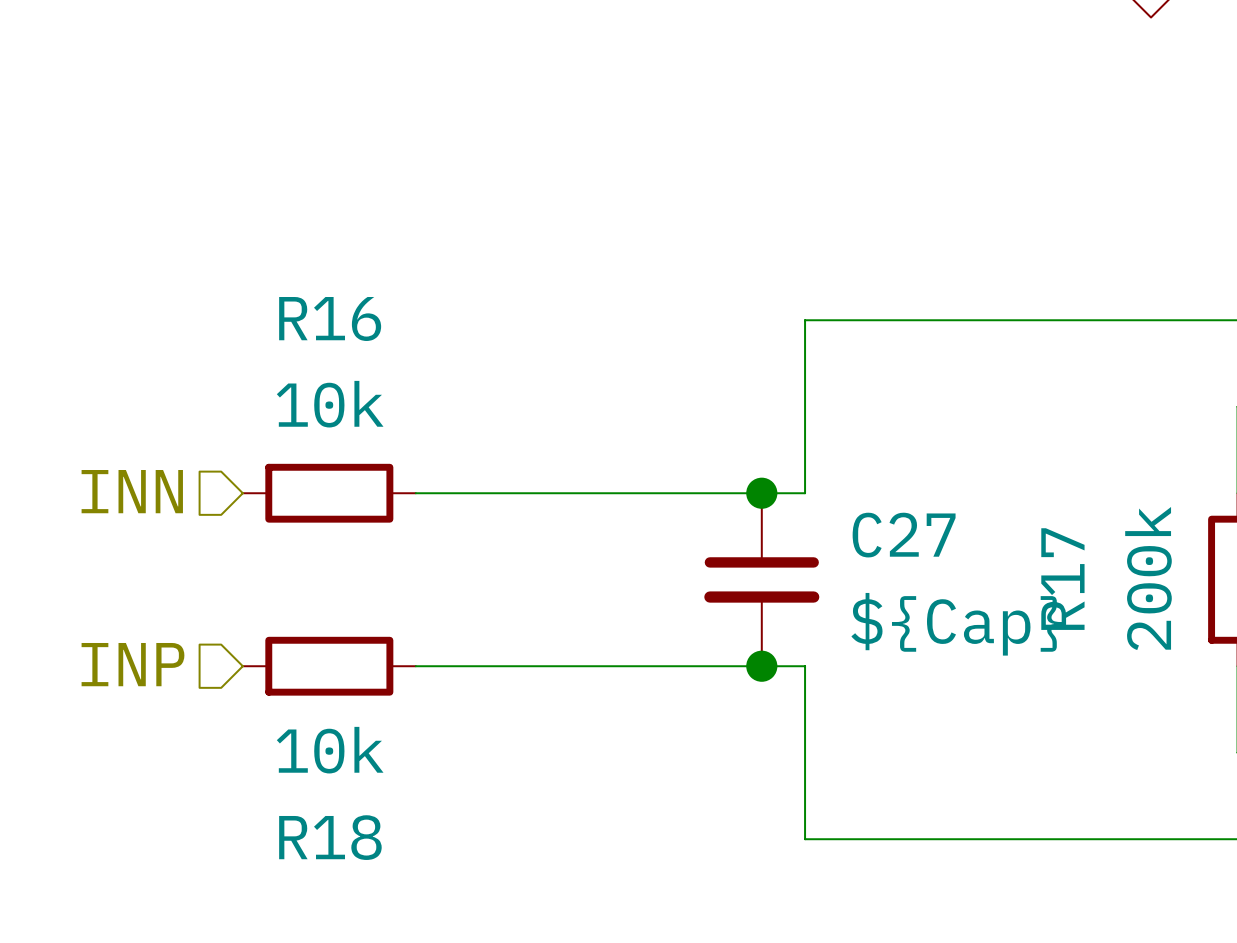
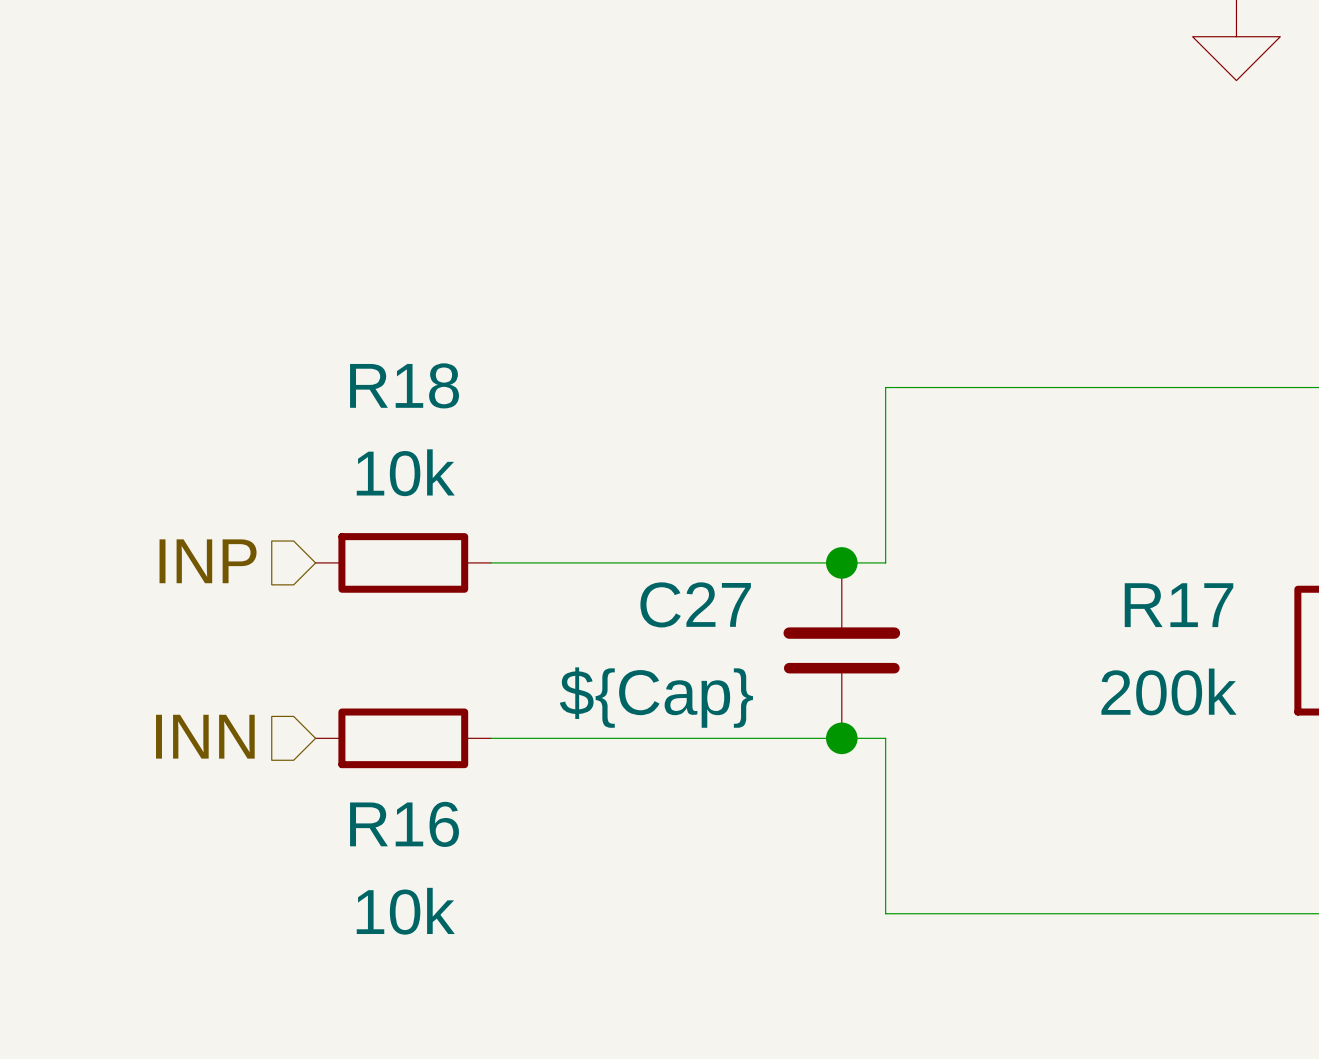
R16 name: R16 (330, 319) -> R18 (404, 385)
hierarchical label: INN (132, 491) -> INP (208, 561)
C27 name position: C27 (904, 535) -> C27 (695, 604)
R17 value rotation: 0° (1148, 578) -> 90° clockwise (1169, 691)
C27 rotation: 0° (761, 579) -> 180° (841, 650)
R17 name rotation: 0° (1062, 579) -> 90° clockwise (1179, 605)
C27 value position: ${Cap} (958, 624) -> ${Cap} (656, 697)
hierarchical label: INP (132, 664) -> INN (205, 736)
R18 value position: 10k (330, 750) -> 10k (405, 911)
R18 name: R18 (330, 837) -> R16 (404, 824)

